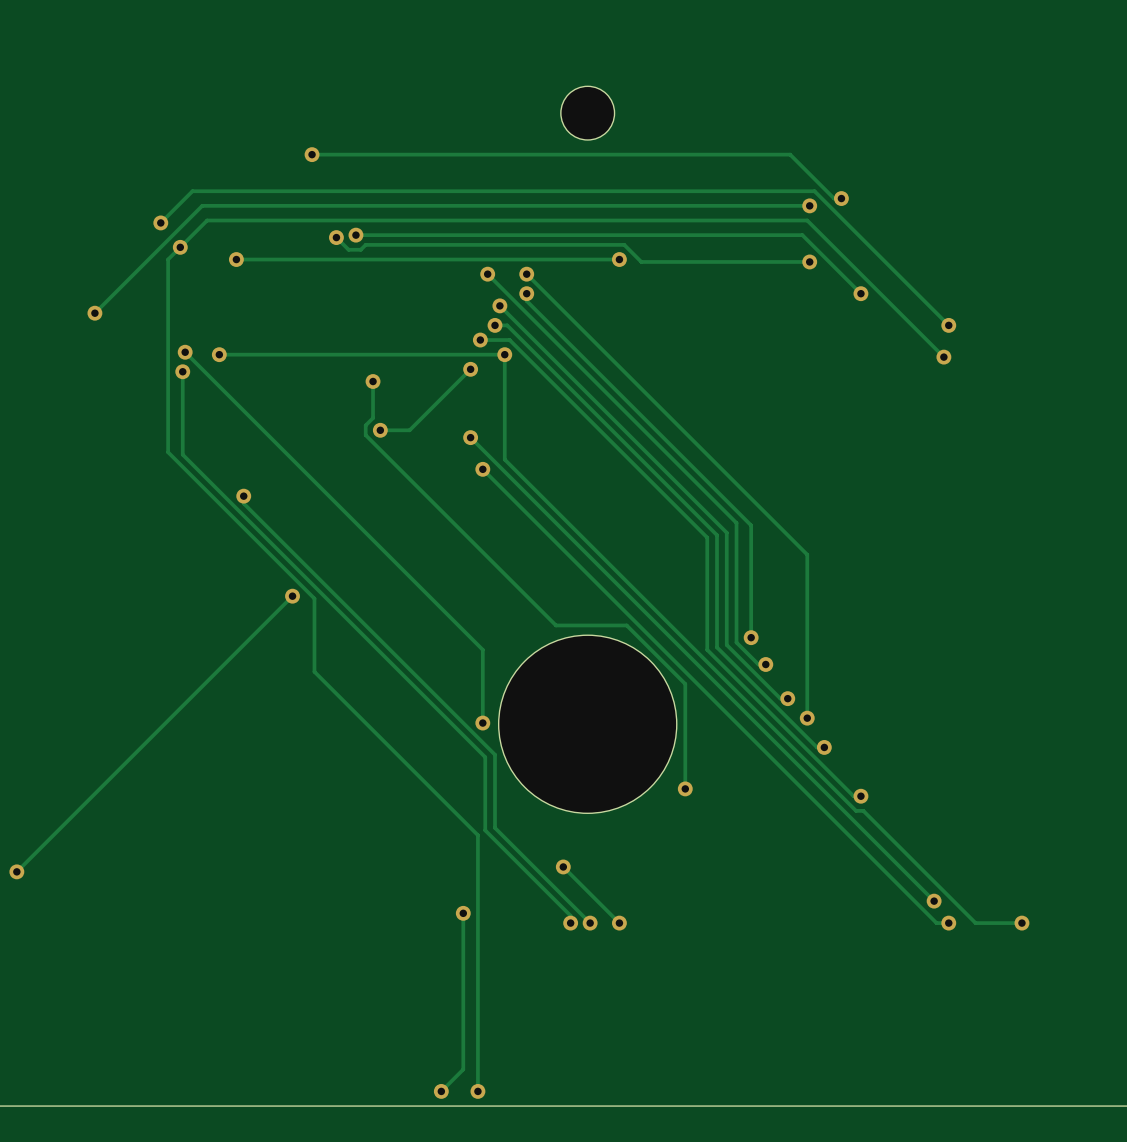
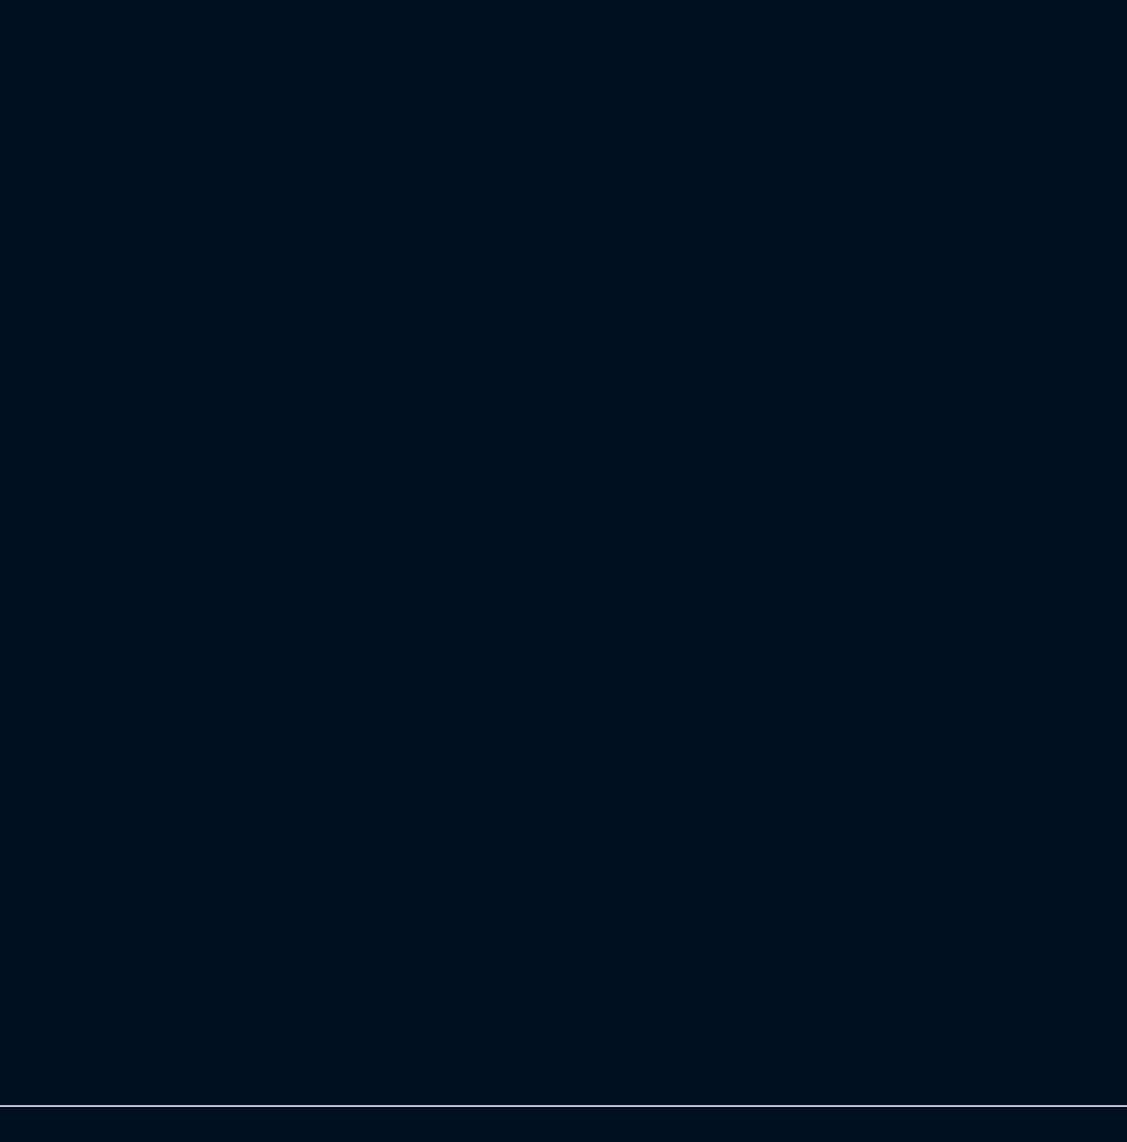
hole: (587, 113) -> none
track: (312, 154) (790, 154) (834, 198) (841, 198) -> none
via: (312, 154) -> none
via: (841, 198) -> none
track: (809, 205) (202, 205) (94, 313) -> none
via: (809, 205) -> none
track: (160, 222) (192, 191) (814, 191) (948, 325) -> none
via: (160, 222) -> none
track: (355, 235) (802, 235) (860, 293) -> none
via: (355, 235) -> none
track: (336, 237) (348, 249) (360, 249) (365, 244) (624, 244) (641, 261) (809, 261) -> none
via: (336, 237) -> none
via: (180, 247) -> none
via: (236, 259) -> none
track: (619, 259) (236, 259) -> none
via: (619, 259) -> none
via: (809, 261) -> none
track: (487, 274) (736, 523) (736, 642) (758, 664) (765, 664) -> none
via: (487, 274) -> none
track: (526, 274) (807, 554) (807, 718) -> none
via: (526, 274) -> none
track: (526, 293) (526, 301) (751, 525) (751, 637) -> none
via: (526, 293) -> none
via: (860, 293) -> none
track: (499, 305) (726, 532) (726, 644) (780, 698) (787, 698) -> none
via: (499, 305) -> none
via: (94, 313) -> none
track: (495, 325) (507, 325) (717, 535) (717, 647) (817, 747) (824, 747) -> none
via: (495, 325) -> none
via: (948, 325) -> none
track: (480, 340) (509, 340) (707, 537) (707, 649) (853, 796) (860, 796) -> none
via: (480, 340) -> none
track: (185, 352) (482, 649) (482, 723) -> none
via: (185, 352) -> none
track: (219, 354) (504, 354) (504, 459) (856, 810) (863, 810) (975, 923) (1021, 923) -> none
via: (219, 354) -> none
via: (504, 354) -> none
track: (943, 357) (807, 220) (207, 220) (168, 259) (168, 452) (314, 598) (314, 671) (477, 835) (477, 1091) -> none
via: (943, 357) -> none
track: (470, 369) (409, 430) (380, 430) -> none
via: (470, 369) -> none
track: (182, 371) (182, 454) (485, 757) (485, 830) (570, 915) (570, 923) -> none
via: (182, 371) -> none
track: (373, 381) (373, 418) (365, 425) (365, 435) (556, 625) (626, 625) (685, 684) (685, 788) -> none
via: (373, 381) -> none
via: (380, 430) -> none
track: (470, 437) (934, 901) -> none
via: (470, 437) -> none
track: (482, 469) (936, 923) (948, 923) -> none
via: (482, 469) -> none
track: (243, 496) (243, 503) (495, 754) (495, 827) (590, 923) -> none
via: (243, 496) -> none
track: (292, 596) (16, 871) -> none
via: (292, 596) -> none
via: (751, 637) -> none
via: (765, 664) -> none
via: (787, 698) -> none
via: (807, 718) -> none
via: (482, 723) -> none
hole: (587, 724) -> none
via: (824, 747) -> none
via: (685, 788) -> none
via: (860, 796) -> none
track: (563, 866) (619, 923) -> none
via: (563, 866) -> none
via: (16, 871) -> none
via: (934, 901) -> none
track: (463, 913) (463, 1069) (441, 1091) -> none
via: (463, 913) -> none
via: (570, 923) -> none
via: (590, 923) -> none
via: (619, 923) -> none
via: (948, 923) -> none
via: (1021, 923) -> none
via: (441, 1091) -> none
via: (477, 1091) -> none

